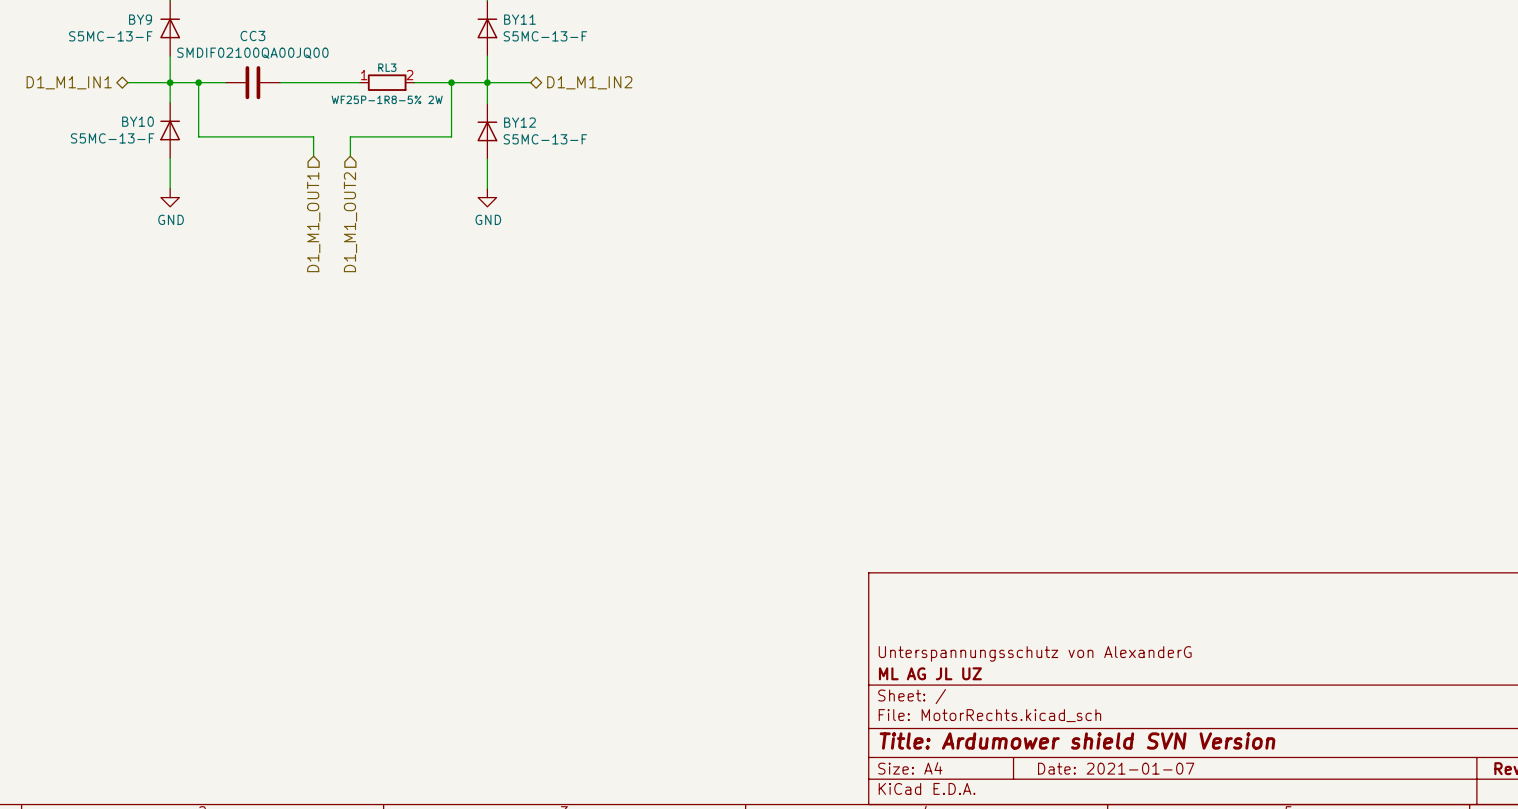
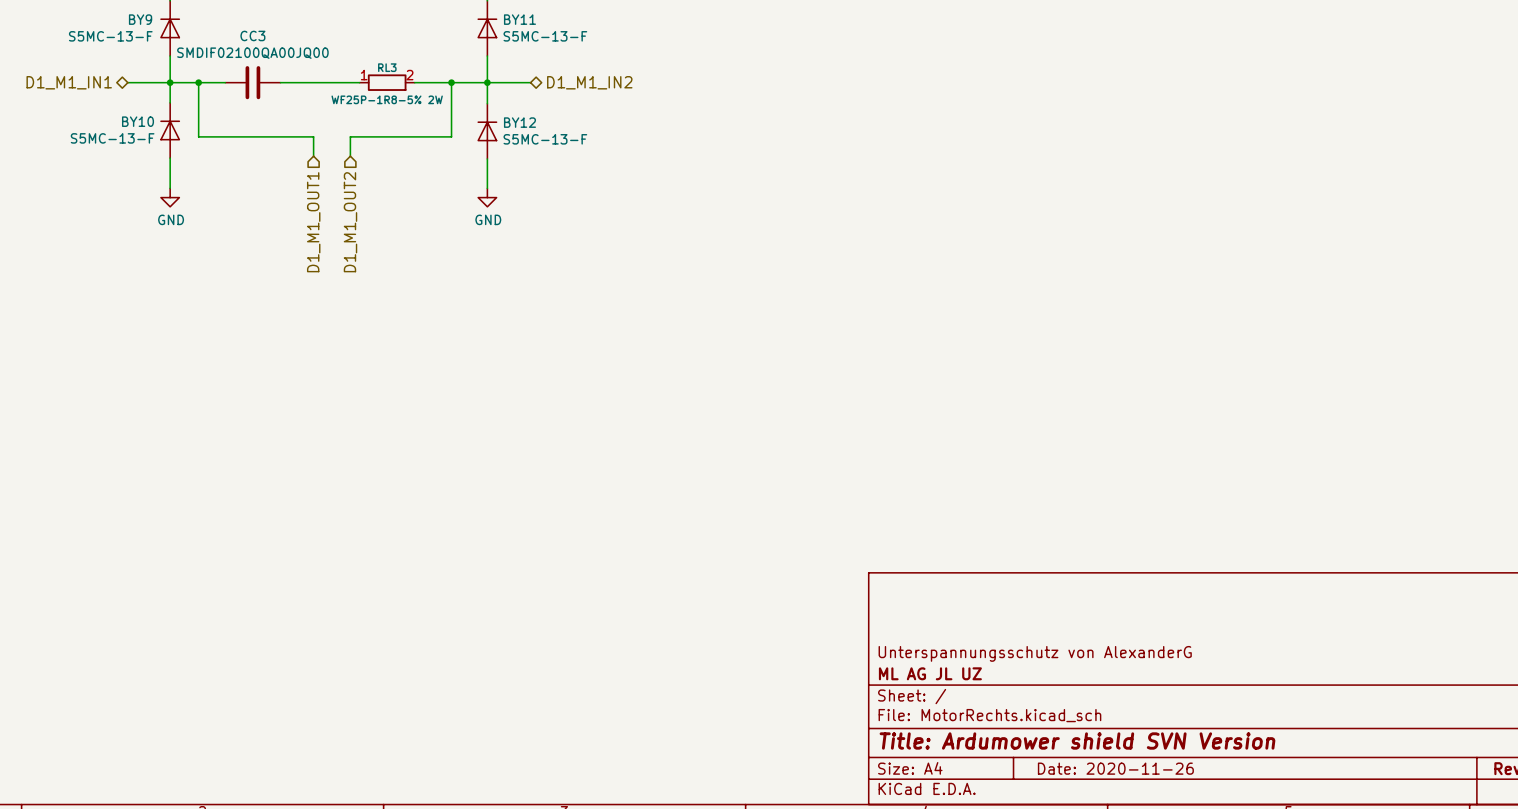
title block: Date: 2021-01-07 (1116, 768) -> Date: 2020-11-26 (1115, 768)

